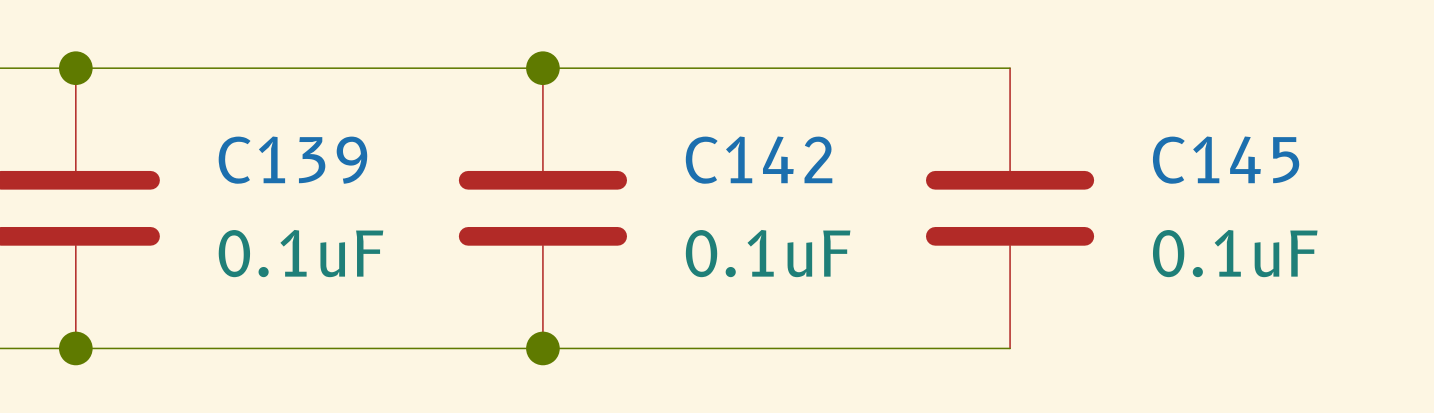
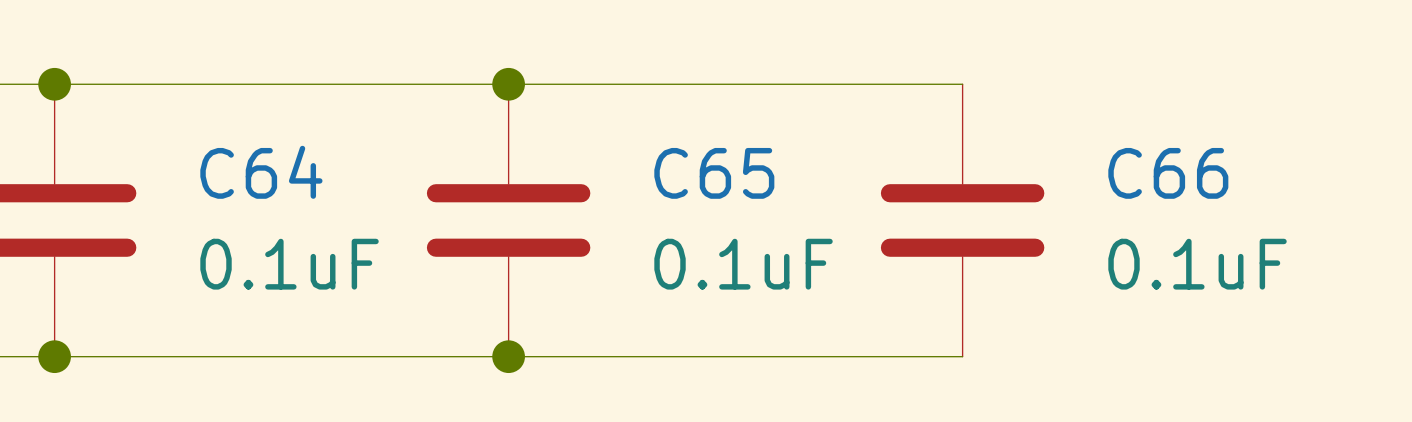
C139 name: C139 (292, 160) -> C64 (261, 172)
C142 name: C142 (759, 160) -> C65 (714, 173)
C145 name: C145 (1226, 160) -> C66 (1168, 173)

